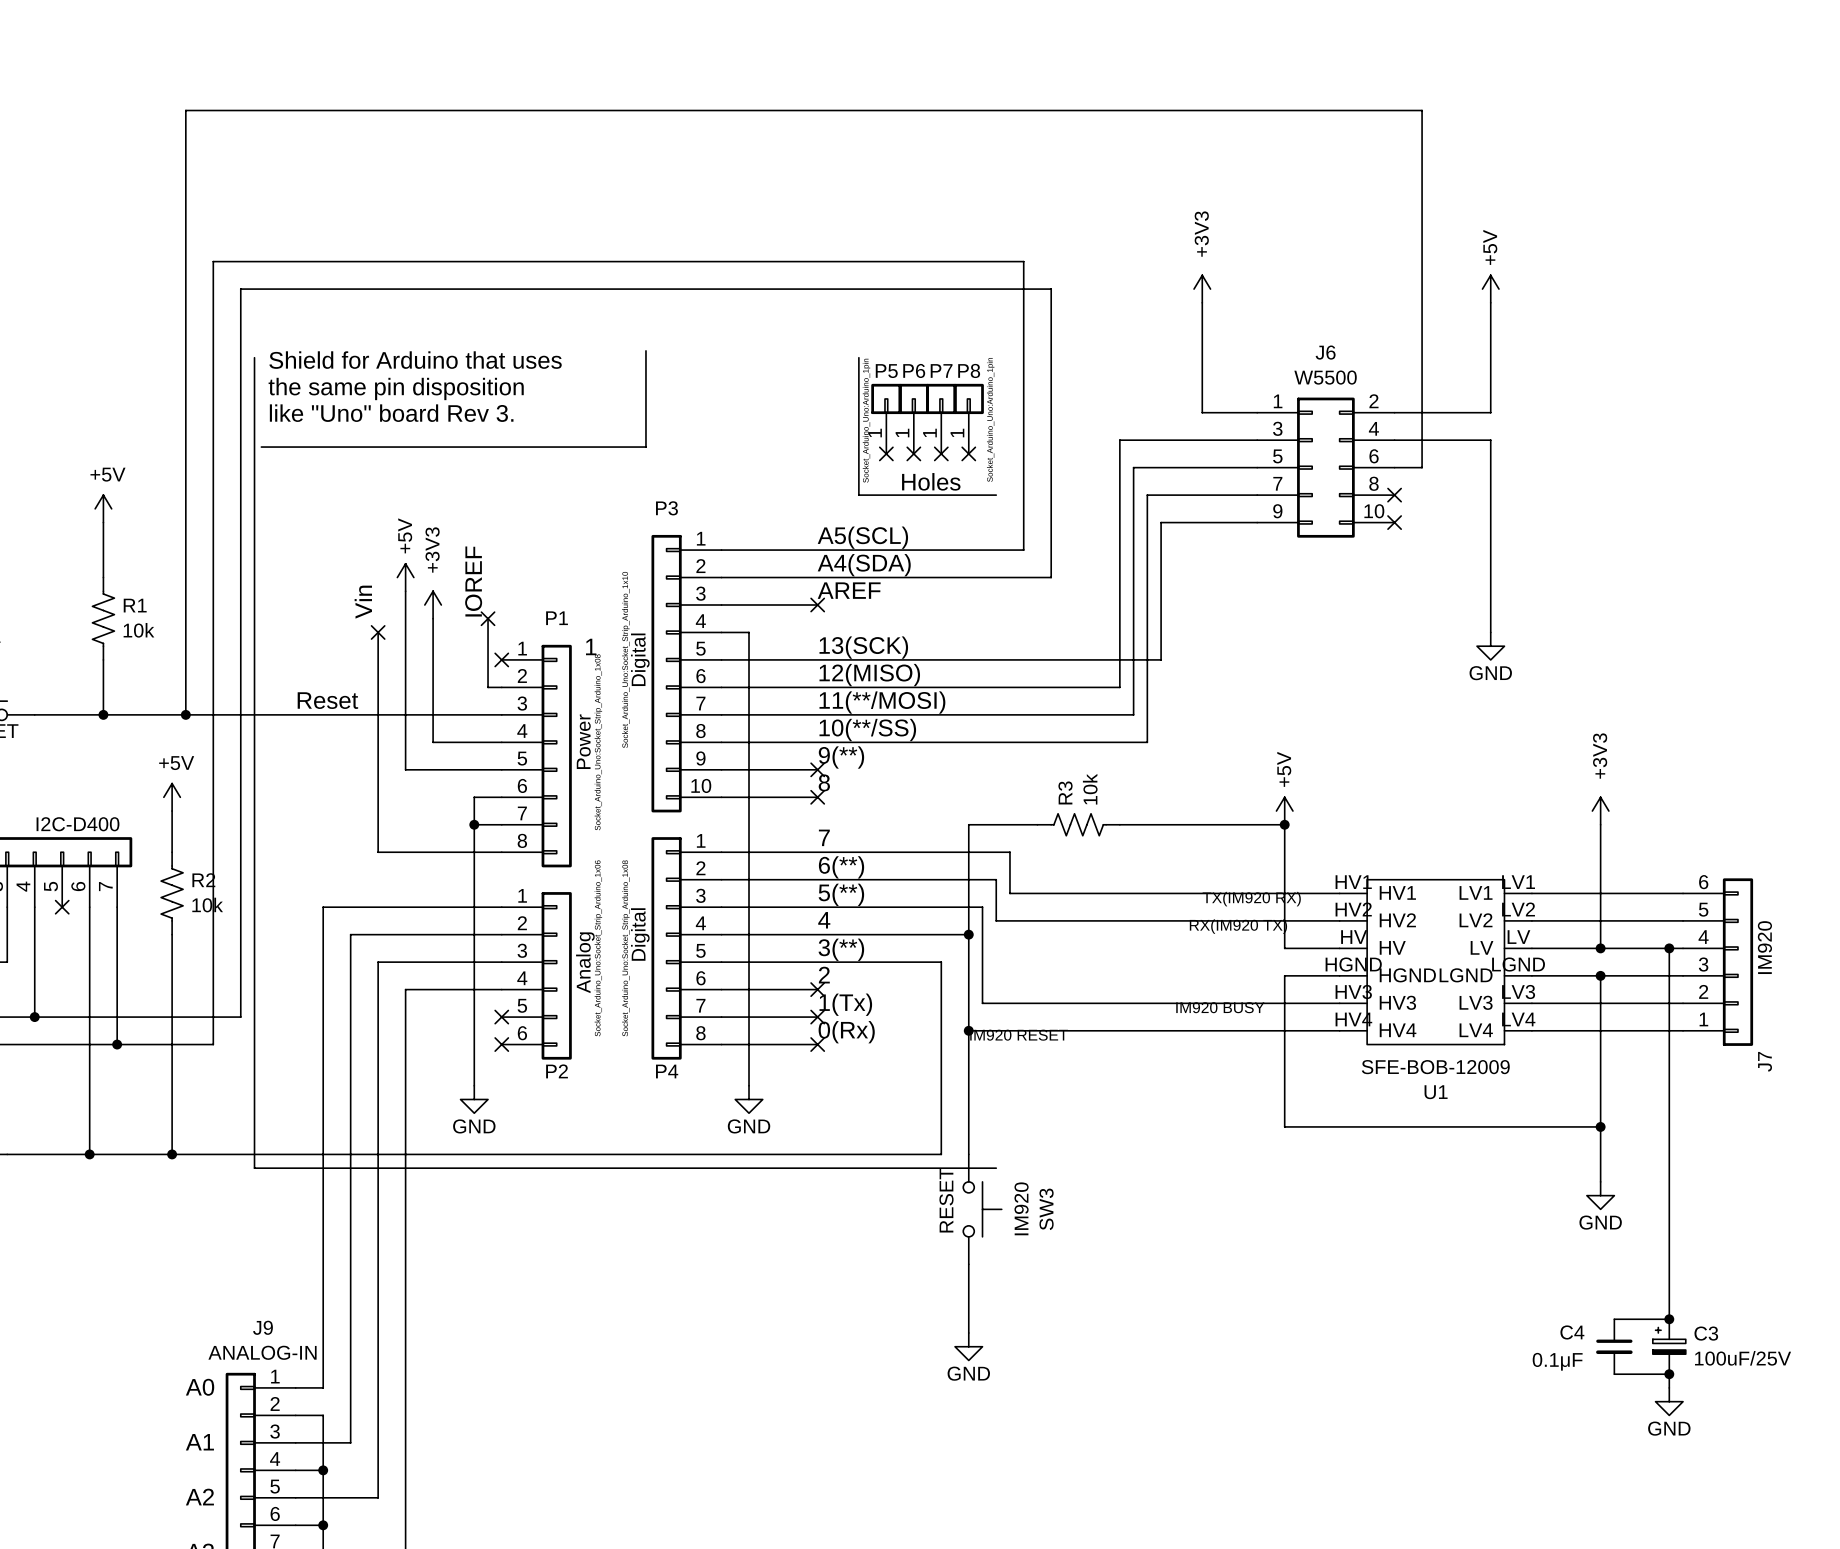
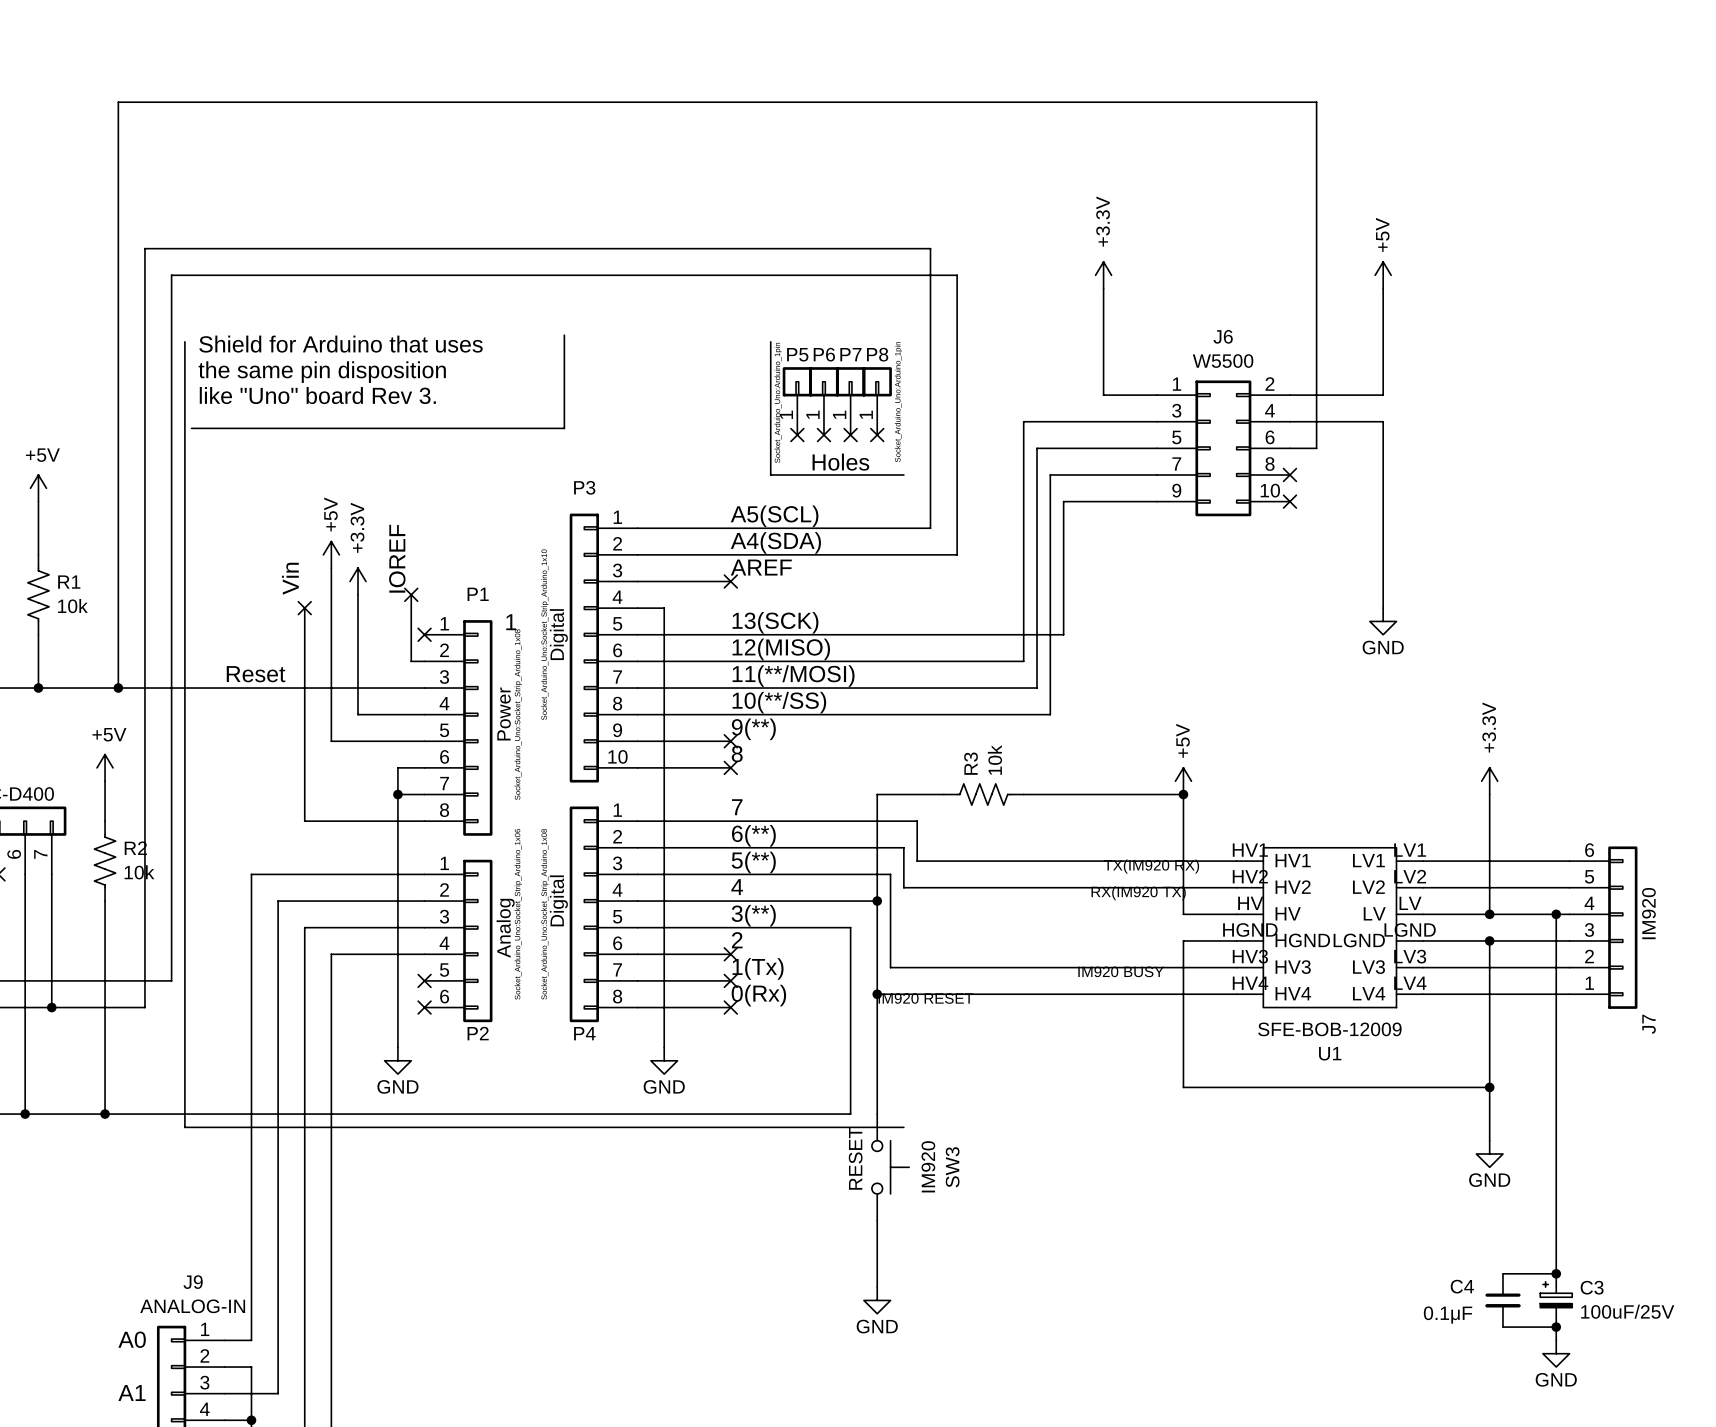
power symbol: +3V3 (1202, 289) -> +3.3V (1103, 275)
power symbol: +3V3 (433, 604) -> +3.3V (357, 581)
power symbol: +3V3 (1600, 811) -> +3.3V (1489, 781)

